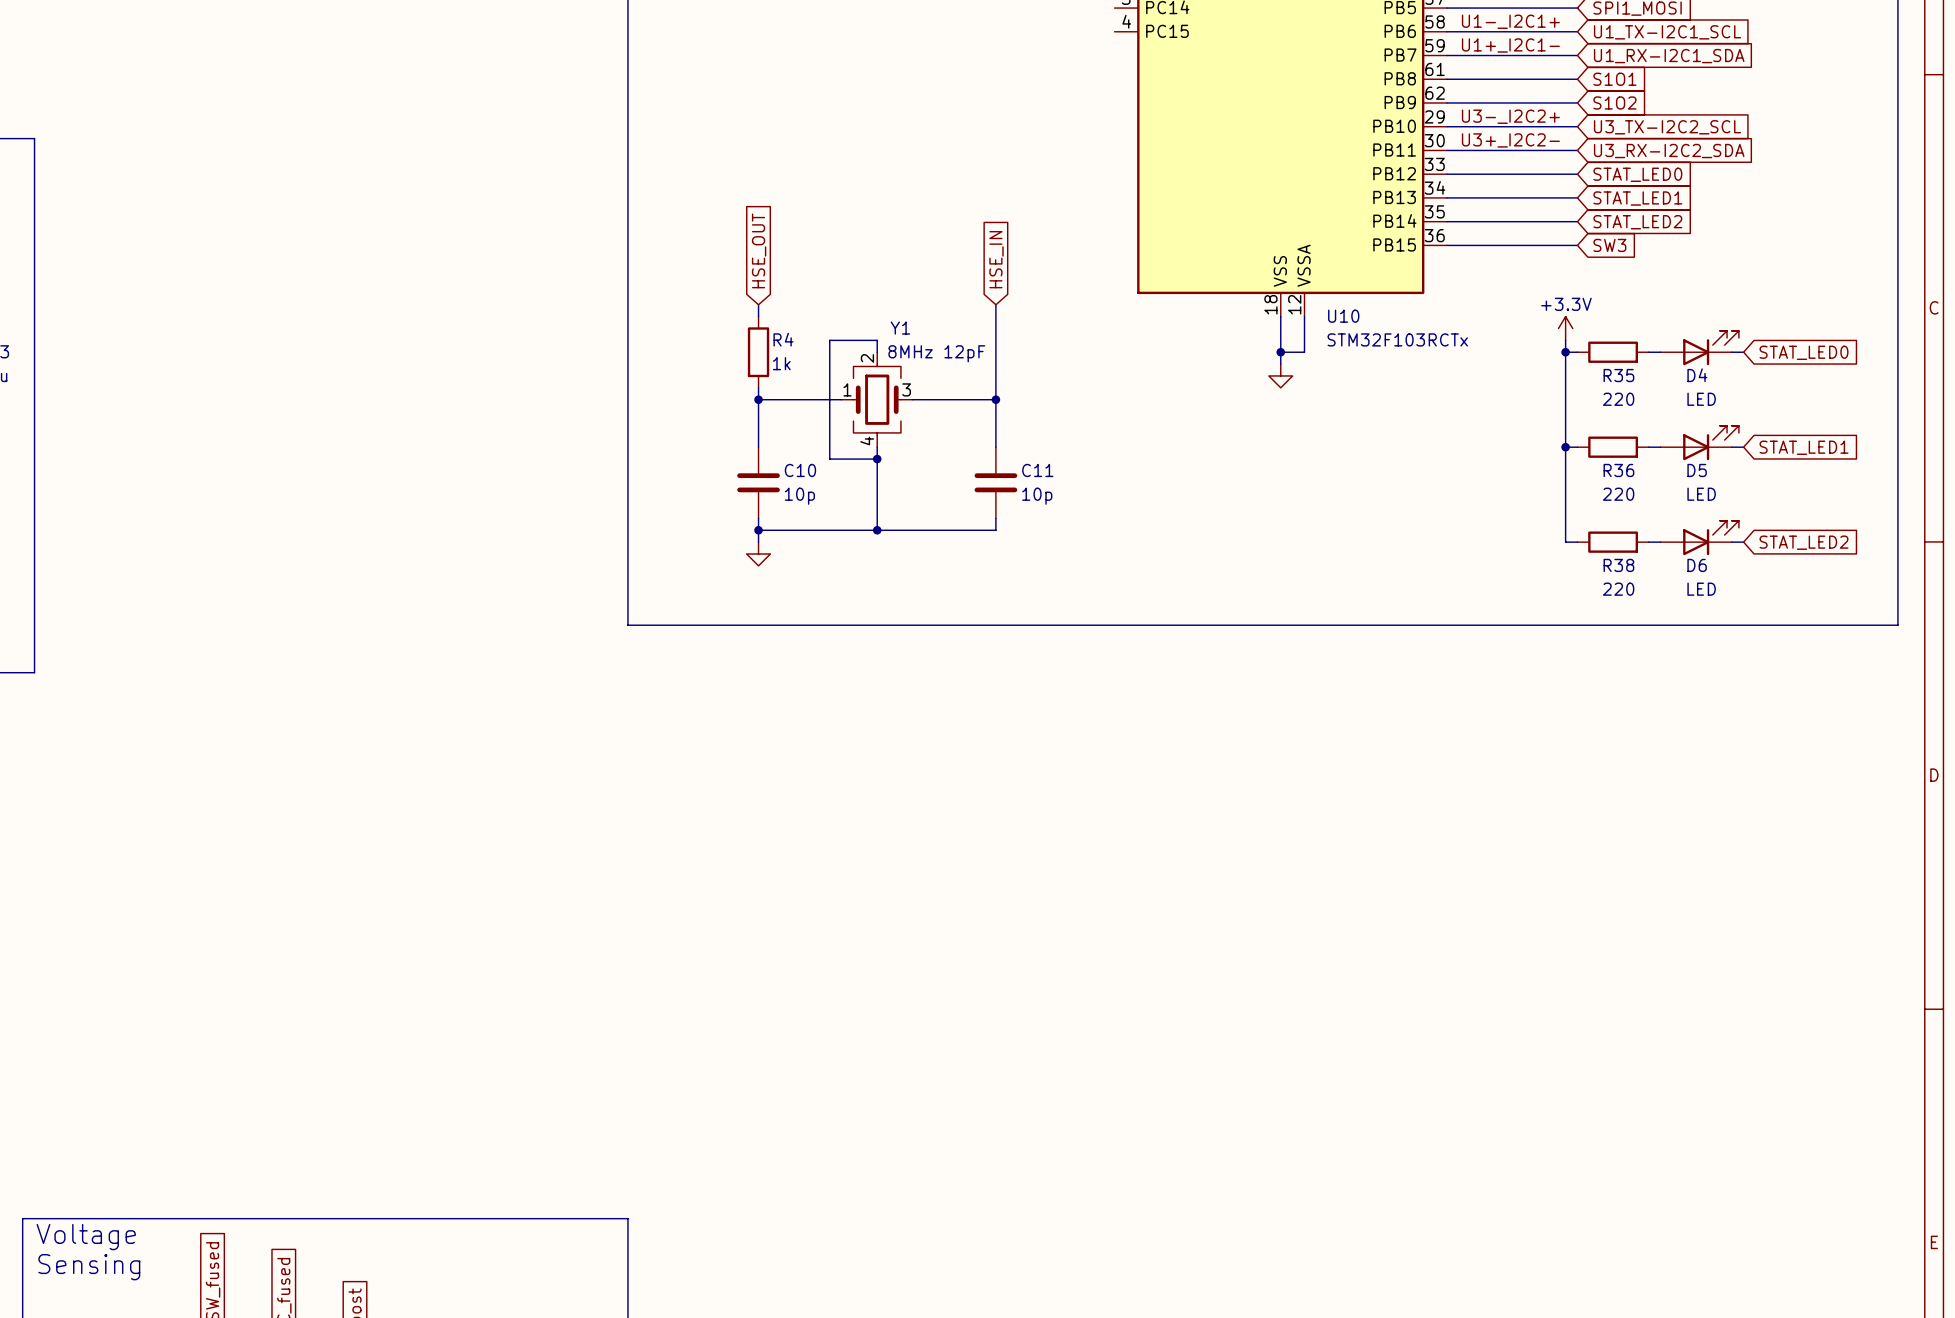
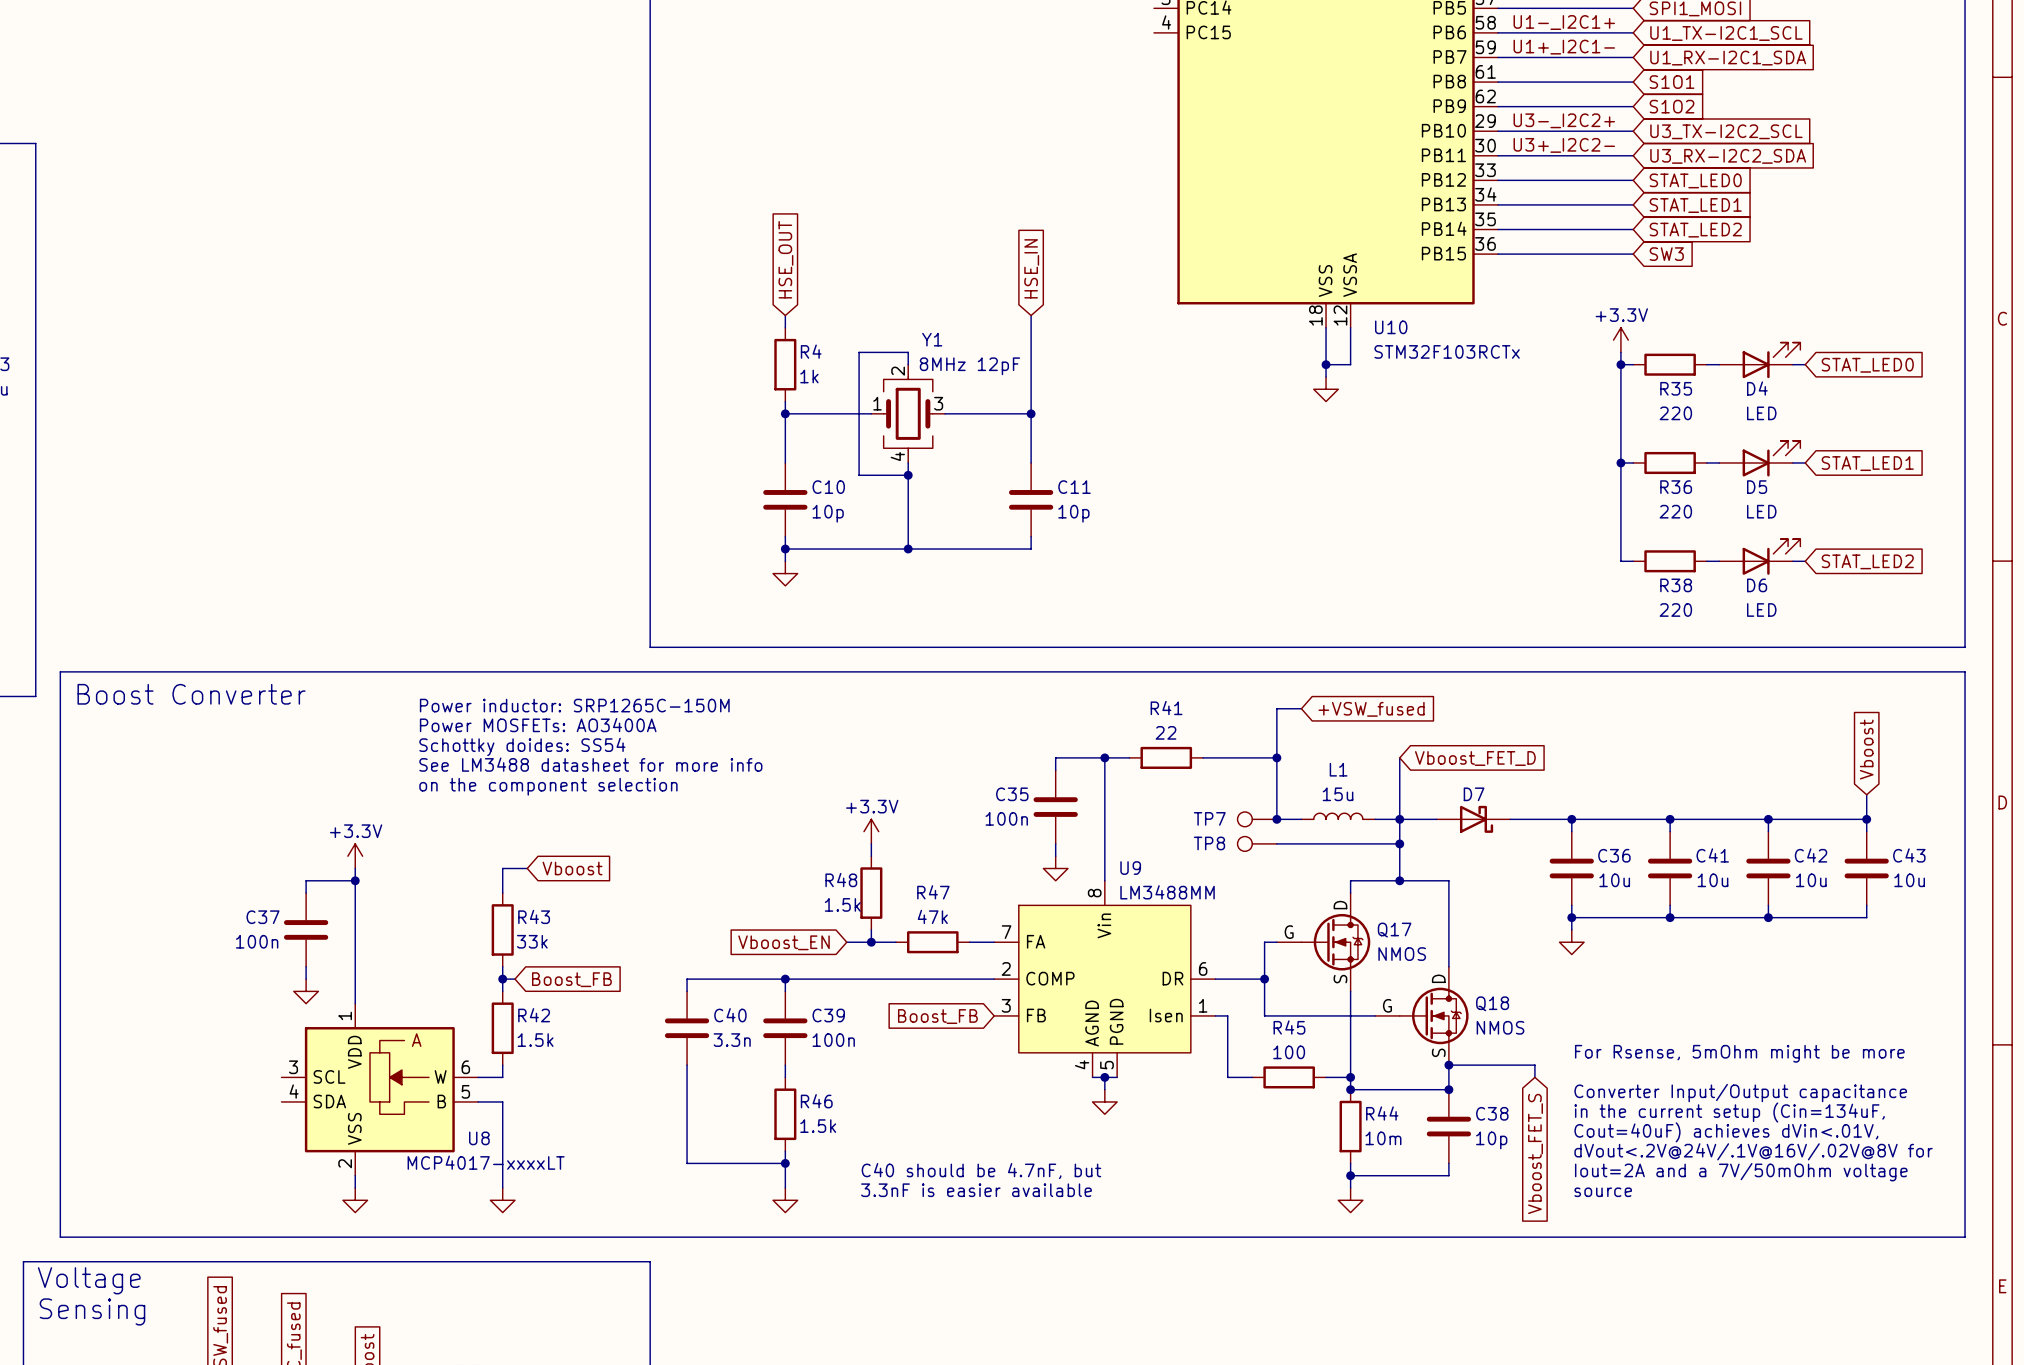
line: none -> (60, 671) (1965, 671) (1965, 1237) (60, 1237) (60, 671)
text: none -> Boost Converter (191, 694)
text: none -> Power inductor: SRP1265C-150M (574, 705)
wire: none -> (1301, 708) (1276, 708) (1276, 819) (1301, 819)
global label: none -> +VSW_fused (1371, 709)
text: none -> Power MOSFETs: AO3400A (538, 725)
text: none -> Schottky doides: SS54 (522, 746)
global label: none -> Vboost (1866, 749)
wire: none -> (1104, 757) (1104, 880)
junction: none -> (1104, 757)
wire: none -> (1129, 757) (1055, 757) (1055, 770)
R41: none -> 22 (1166, 757)
wire: none -> (1203, 757) (1276, 757)
junction: none -> (1276, 757)
wire: none -> (1399, 757) (1399, 880)
global label: none -> Vboost_FET_D (1475, 758)
text: none -> See LM3488 datasheet for more info (590, 764)
text: none -> on the component selection (548, 786)
wire: none -> (1866, 794) (1866, 831)
C35: none -> 100n (1055, 807)
L1: none -> 15u (1338, 816)
TP7: none -> (1257, 819)
junction: none -> (1276, 819)
wire: none -> (1375, 819) (1436, 819)
junction: none -> (1399, 819)
D7: none -> (1473, 819)
wire: none -> (1510, 819) (1866, 819)
wire: none -> (1571, 819) (1571, 831)
junction: none -> (1571, 819)
wire: none -> (1670, 819) (1670, 831)
junction: none -> (1670, 819)
wire: none -> (1768, 819) (1768, 831)
junction: none -> (1768, 819)
junction: none -> (1866, 819)
power symbol: none -> +3.3V (871, 831)
wire: none -> (871, 843) (871, 856)
wire: none -> (1055, 843) (1055, 856)
TP8: none -> (1257, 843)
wire: none -> (1276, 843) (1399, 843)
junction: none -> (1399, 843)
power symbol: none -> +3.3V (355, 856)
wire: none -> (355, 868) (355, 1003)
wire: none -> (527, 868) (502, 868) (502, 893)
global label: none -> Vboost (572, 868)
power symbol: none -> (1055, 868)
C36: none -> 10u (1571, 868)
C41: none -> 10u (1670, 868)
C42: none -> 10u (1768, 868)
C43: none -> 10u (1866, 868)
wire: none -> (355, 880) (306, 880) (306, 893)
junction: none -> (355, 880)
junction: none -> (1399, 880)
R48: none -> 1.5k (871, 893)
wire: none -> (1350, 893) (1350, 880) (1448, 880) (1448, 966)
wire: none -> (1571, 905) (1571, 929)
wire: none -> (1670, 905) (1670, 917)
wire: none -> (1768, 905) (1768, 917)
wire: none -> (1866, 905) (1866, 917) (1571, 917)
junction: none -> (1571, 917)
junction: none -> (1670, 917)
junction: none -> (1768, 917)
C37: none -> 100n (306, 929)
R43: none -> 33k (502, 929)
wire: none -> (871, 929) (871, 942)
global label: none -> Vboost_EN (784, 942)
wire: none -> (846, 942) (895, 942)
junction: none -> (871, 942)
R47: none -> 47k (932, 942)
wire: none -> (969, 942) (994, 942)
wire: none -> (1276, 942) (1264, 942) (1264, 1015) (1375, 1015)
Q17: none -> NMOS (1323, 942)
power symbol: none -> (1571, 942)
wire: none -> (306, 966) (306, 979)
wire: none -> (502, 966) (502, 991)
wire: none -> (502, 979) (515, 979)
junction: none -> (502, 979)
wire: none -> (785, 979) (785, 991)
junction: none -> (785, 979)
wire: none -> (994, 979) (687, 979) (687, 991)
U9: none -> LM3488MM (1104, 979)
wire: none -> (1215, 979) (1264, 979)
junction: none -> (1264, 979)
global label: none -> Boost_FB (571, 979)
power symbol: none -> (306, 991)
wire: none -> (1350, 991) (1350, 1089) (1448, 1089) (1448, 1065) (1534, 1065) (1534, 1077)
global label: none -> Boost_FB (937, 1016)
wire: none -> (1215, 1015) (1227, 1015) (1227, 1077) (1252, 1077)
Q18: none -> NMOS (1421, 1015)
R42: none -> 1.5k (502, 1028)
C40: none -> 3.3n (687, 1028)
C39: none -> 100n (785, 1028)
text: none -> For Rsense, 5mOhm might be more (1739, 1053)
wire: none -> (502, 1065) (502, 1077) (478, 1077)
wire: none -> (687, 1065) (687, 1163) (785, 1163)
wire: none -> (785, 1065) (785, 1077)
junction: none -> (1448, 1065)
wire: none -> (1092, 1077) (1117, 1077)
wire: none -> (1104, 1077) (1104, 1089)
junction: none -> (1104, 1077)
R45: none -> 100 (1289, 1077)
wire: none -> (1326, 1077) (1350, 1077)
junction: none -> (1350, 1077)
U8: none -> MCP4017-xxxxLT (379, 1089)
junction: none -> (1350, 1089)
junction: none -> (1448, 1089)
text: none -> Converter Input/Output capacitance (1740, 1093)
wire: none -> (478, 1101) (502, 1101) (502, 1188)
power symbol: none -> (1104, 1101)
text: none -> in the current setup (Cin=134uF, (1729, 1112)
R46: none -> 1.5k (785, 1114)
R44: none -> 10m (1350, 1126)
C38: none -> 10p (1448, 1126)
text: none -> Cout=40uF) achieves dVin<.01V, (1726, 1132)
wire: none -> (785, 1151) (785, 1188)
text: none -> dVout<.2V@24V/.1V@16V/.02V@8V for (1753, 1151)
global label: none -> Vboost_FET_S (1535, 1153)
junction: none -> (785, 1163)
wire: none -> (1350, 1163) (1350, 1188)
wire: none -> (1448, 1163) (1448, 1175) (1350, 1175)
text: none -> C40 should be 4.7nF, but (981, 1171)
text: none -> Iout=2A and a 7V/50mOhm voltage (1741, 1172)
wire: none -> (355, 1175) (355, 1188)
junction: none -> (1350, 1175)
text: none -> 3.3nF is easier available (976, 1190)
text: none -> source (1603, 1192)
power symbol: none -> (355, 1200)
power symbol: none -> (502, 1200)
power symbol: none -> (785, 1200)
power symbol: none -> (1350, 1200)

